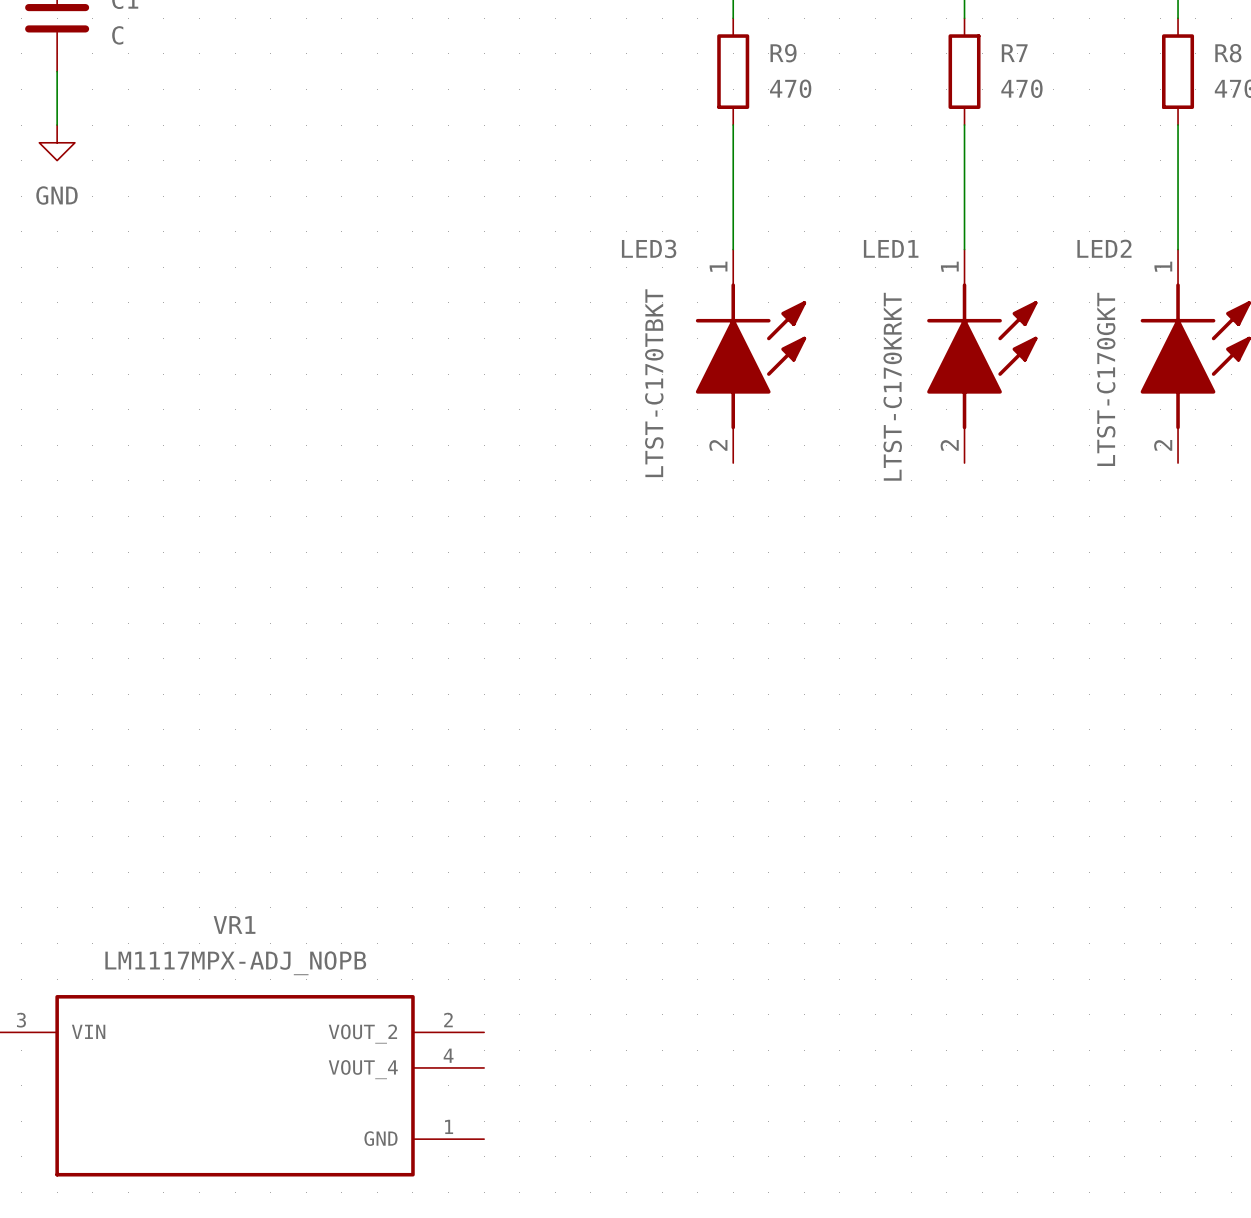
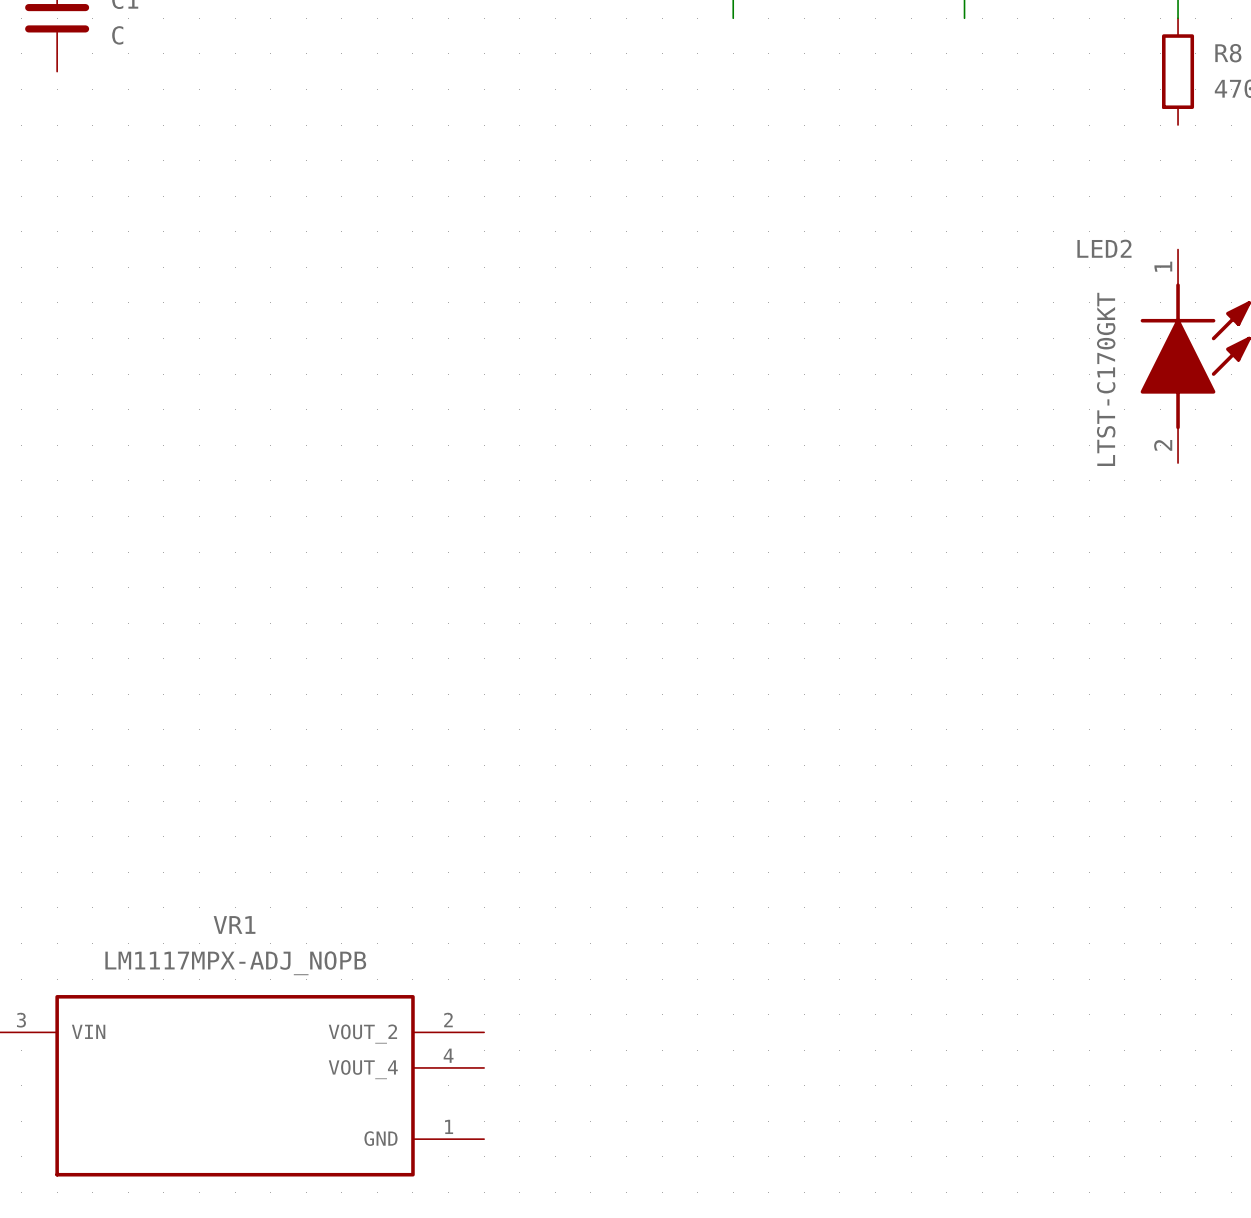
wire: (57, 71) (57, 125) -> none
R9: 470 (733, 71) -> none
R7: 470 (964, 71) -> none
wire: (733, 125) (733, 249) -> none
wire: (964, 125) (964, 249) -> none
wire: (1178, 125) (1178, 249) -> none
power symbol: GND (57, 142) -> none
LED3: LTST-C170TBKT (751, 356) -> none
LED1: LTST-C170KRKT (982, 356) -> none

